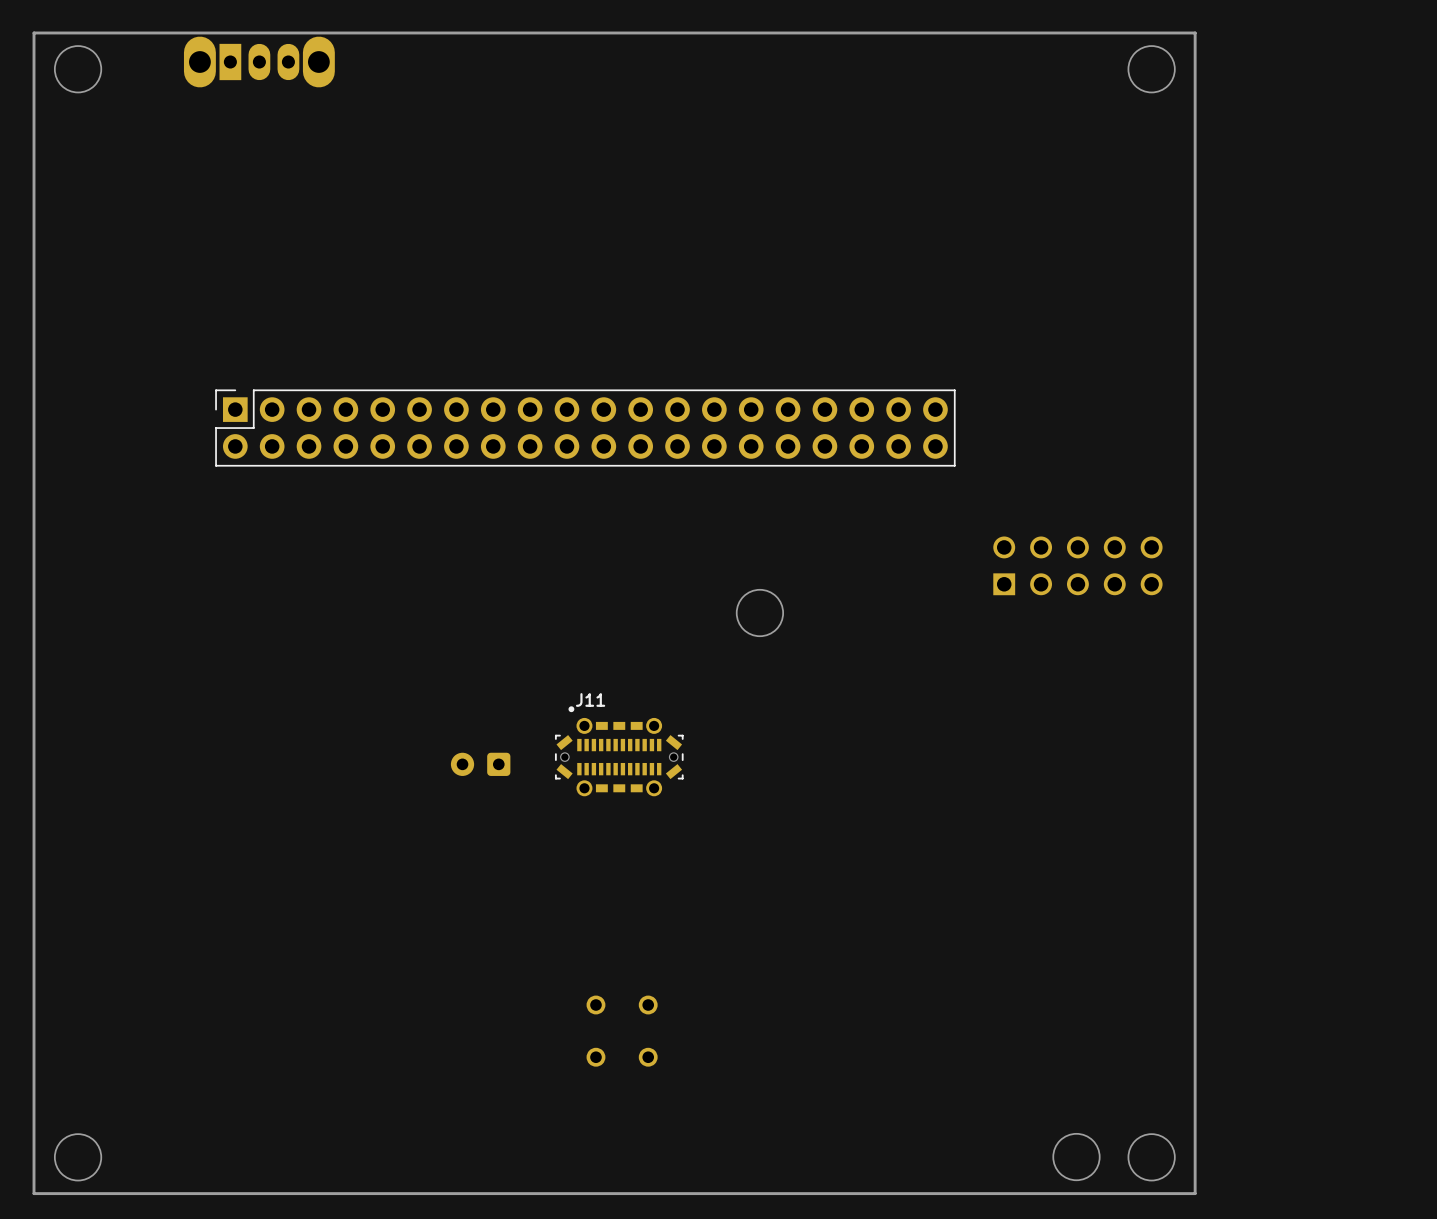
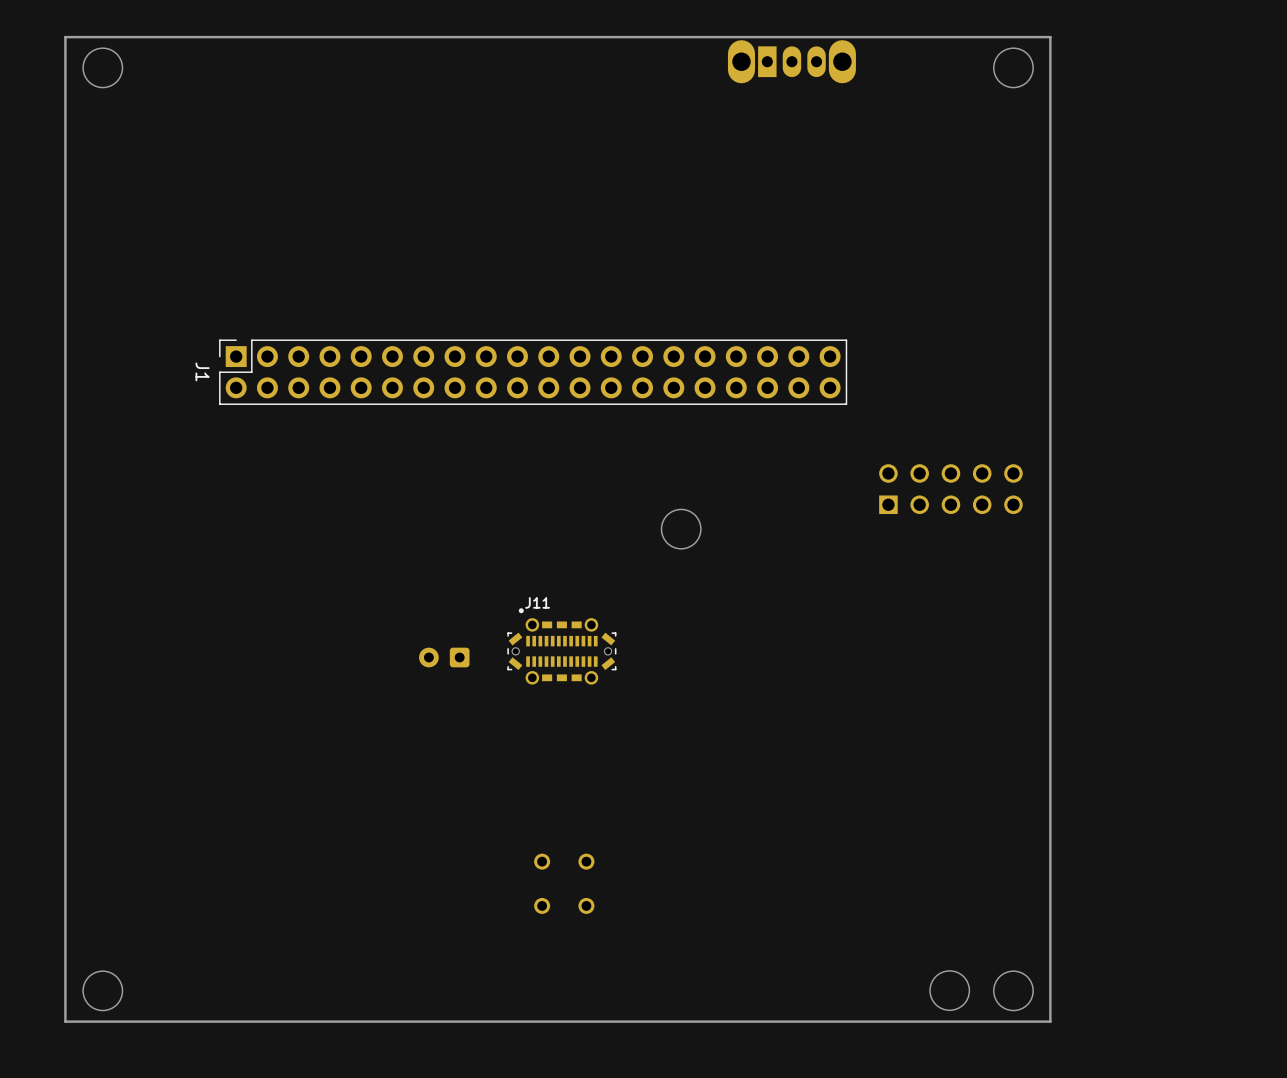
part: (259, 62) -> none
part: none -> (791, 61)
J1 name: none -> J1 (202, 371)

